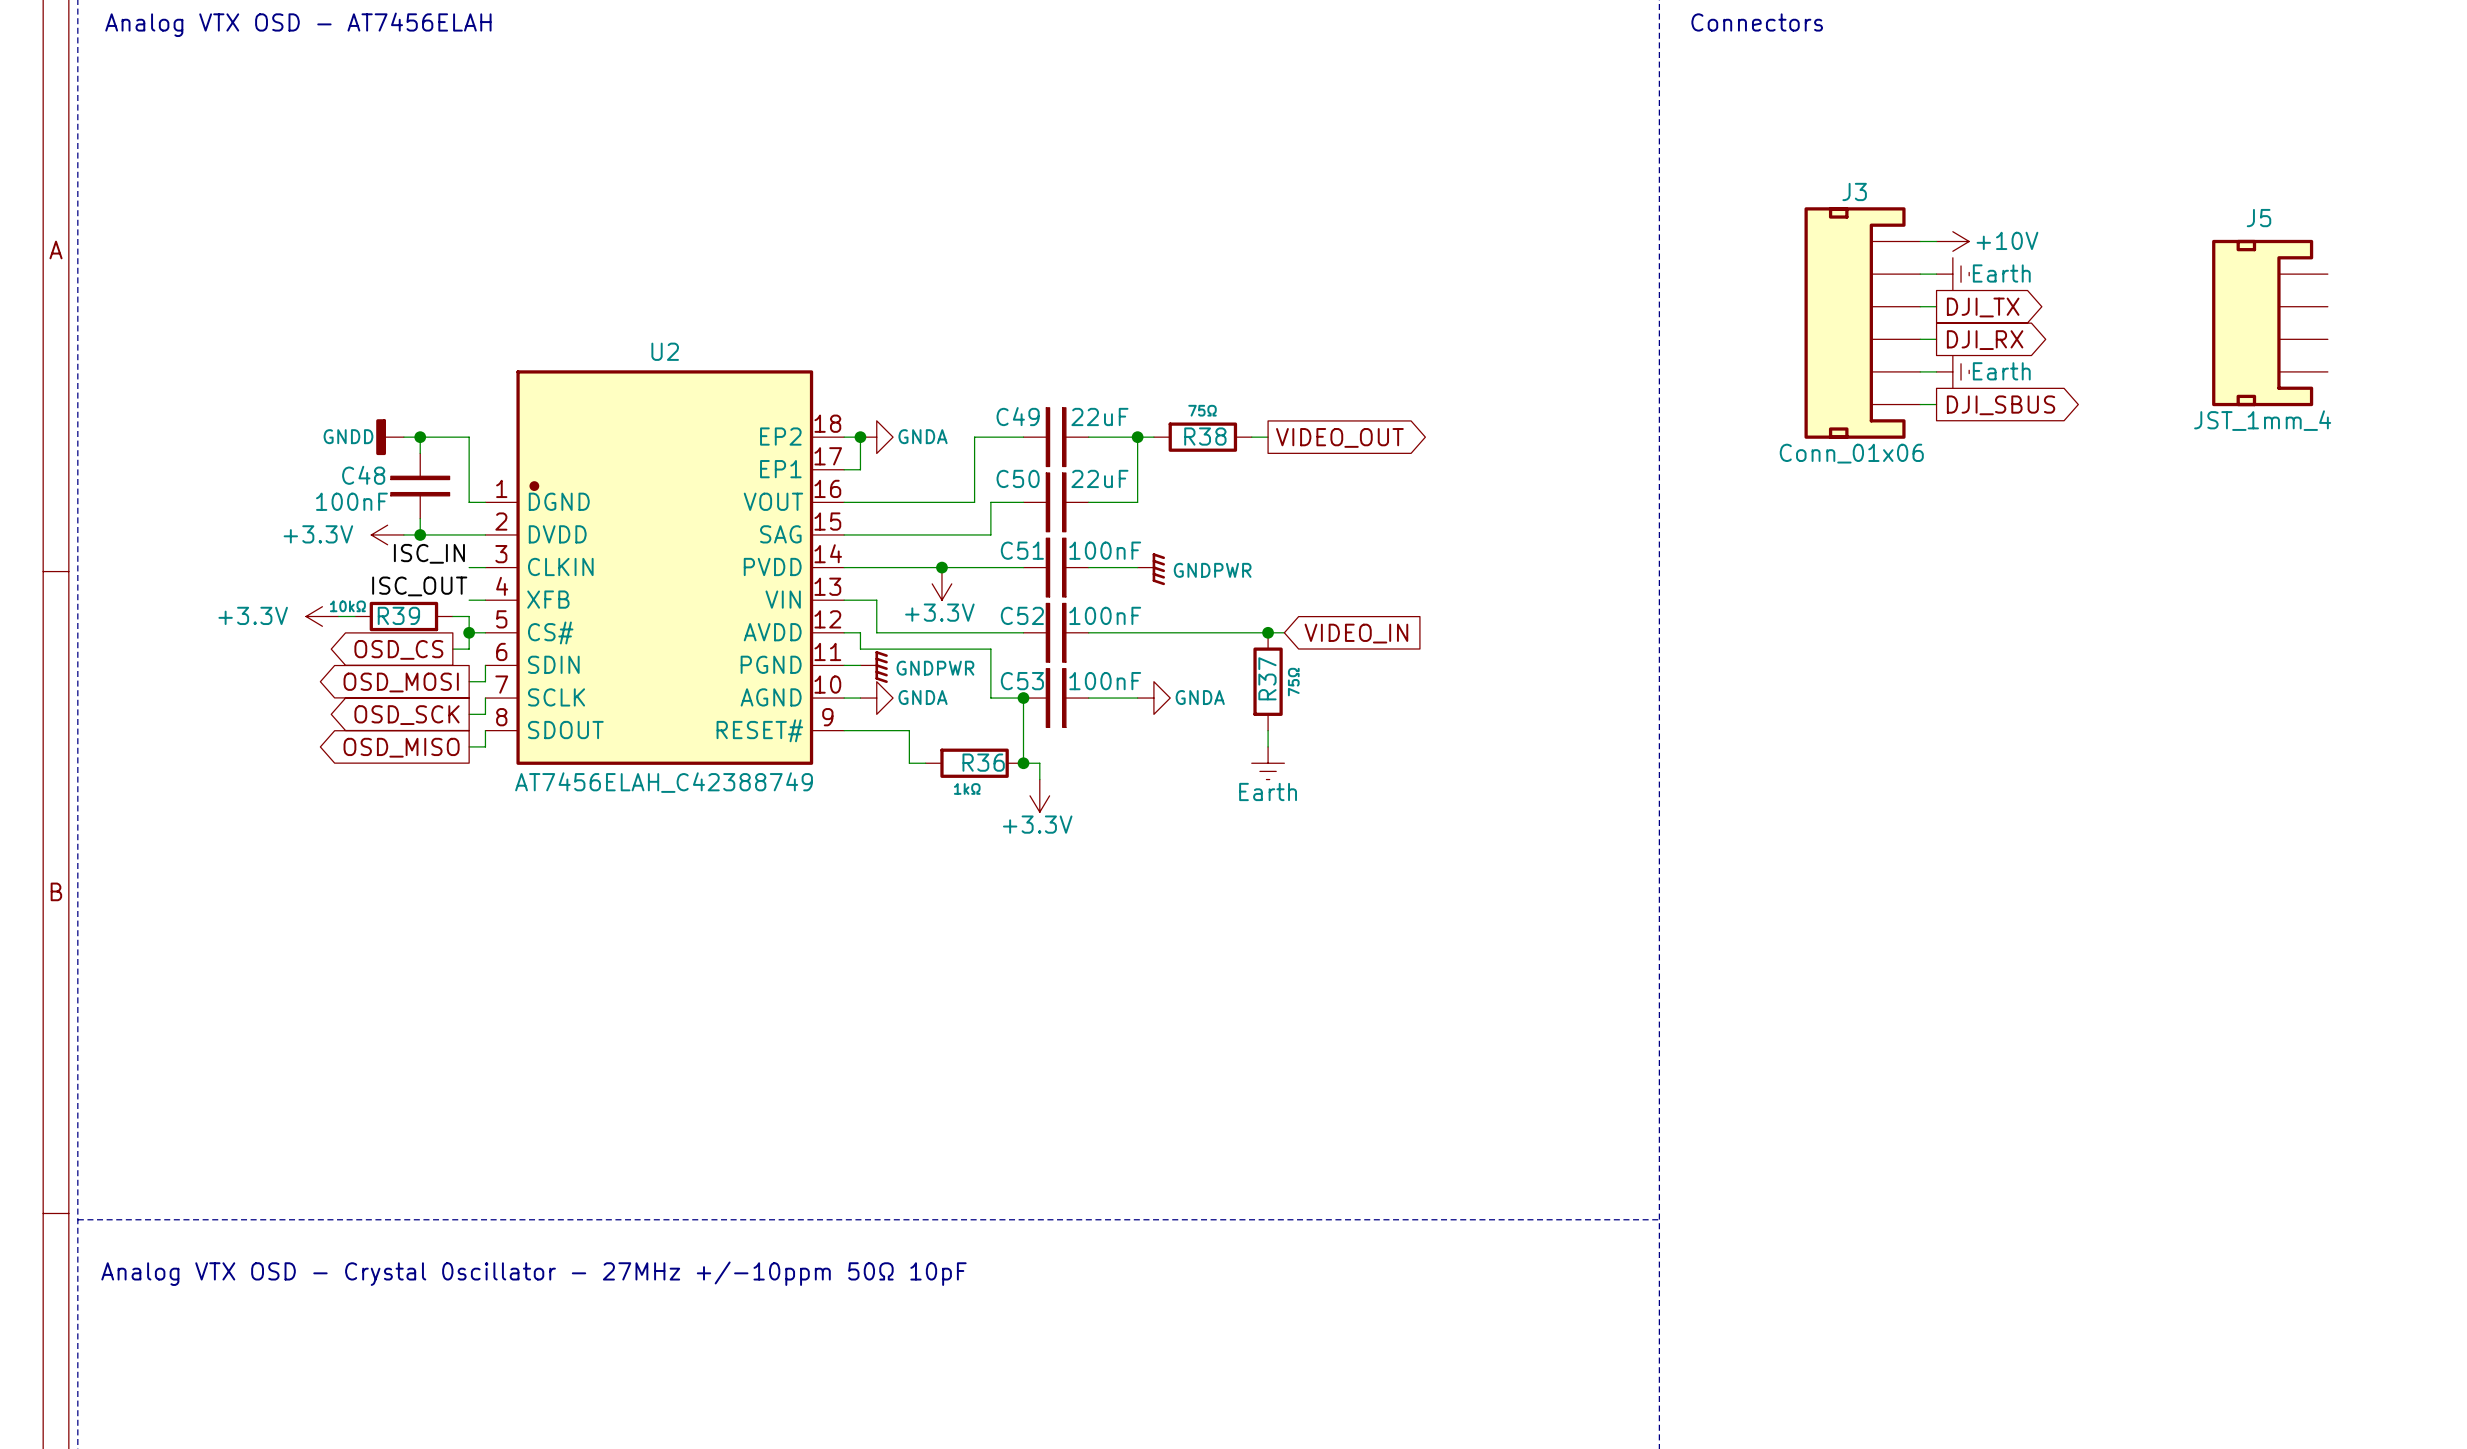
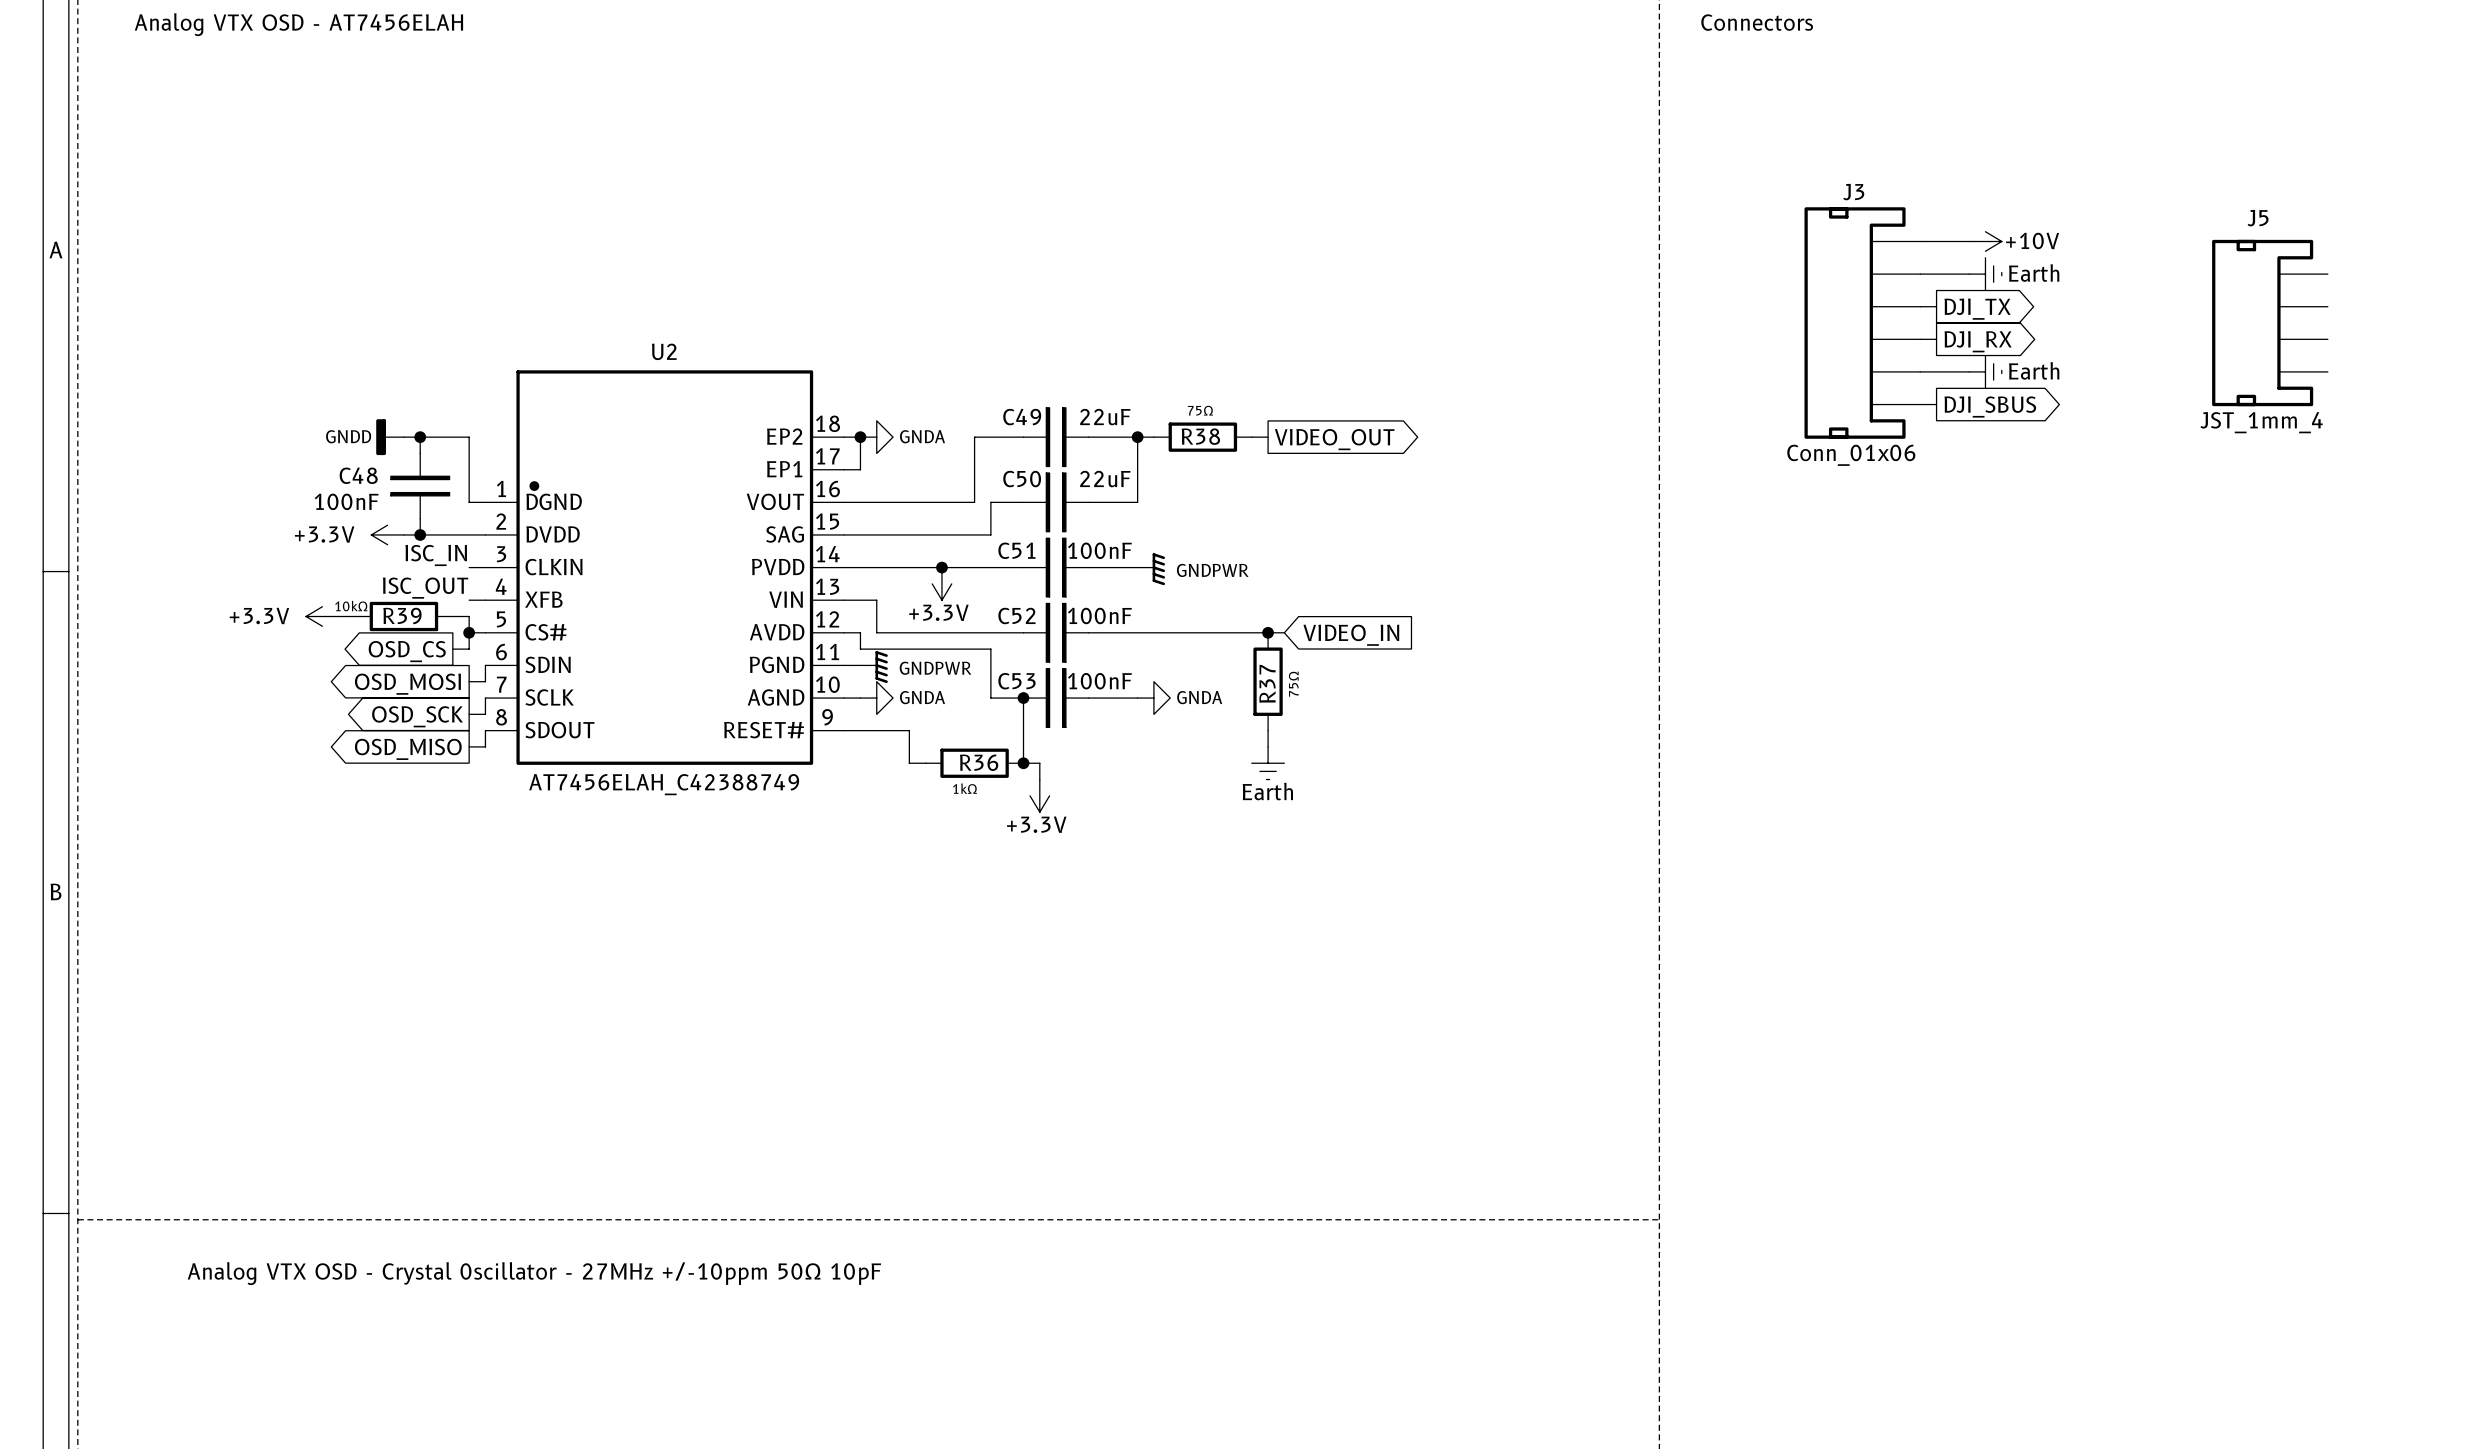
power symbol position: +10V (1952, 241) -> +10V (1985, 241)
power symbol position: Earth (1952, 274) -> Earth (1985, 274)
power symbol position: Earth (1952, 371) -> Earth (1985, 371)

